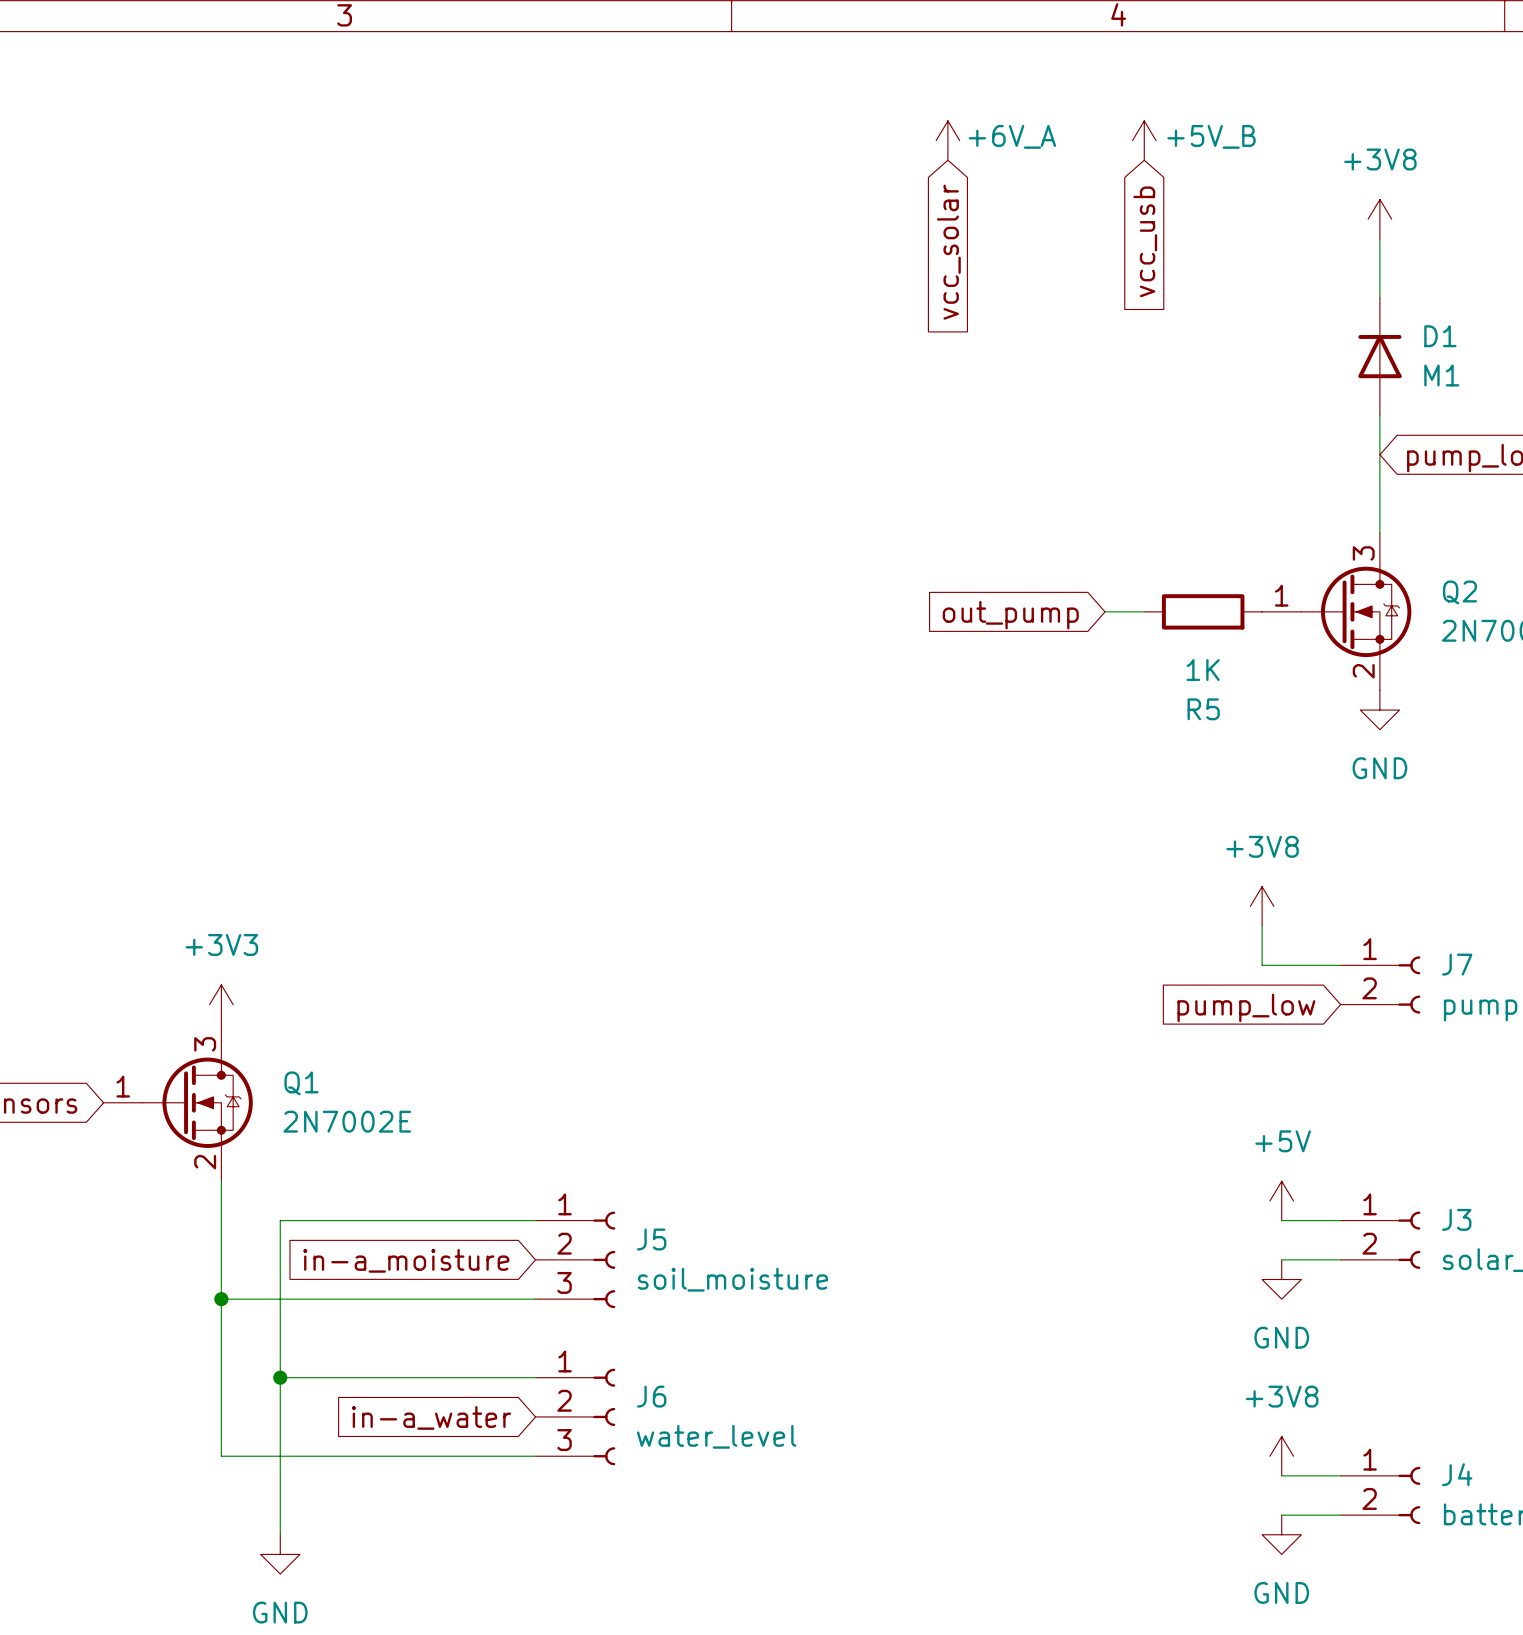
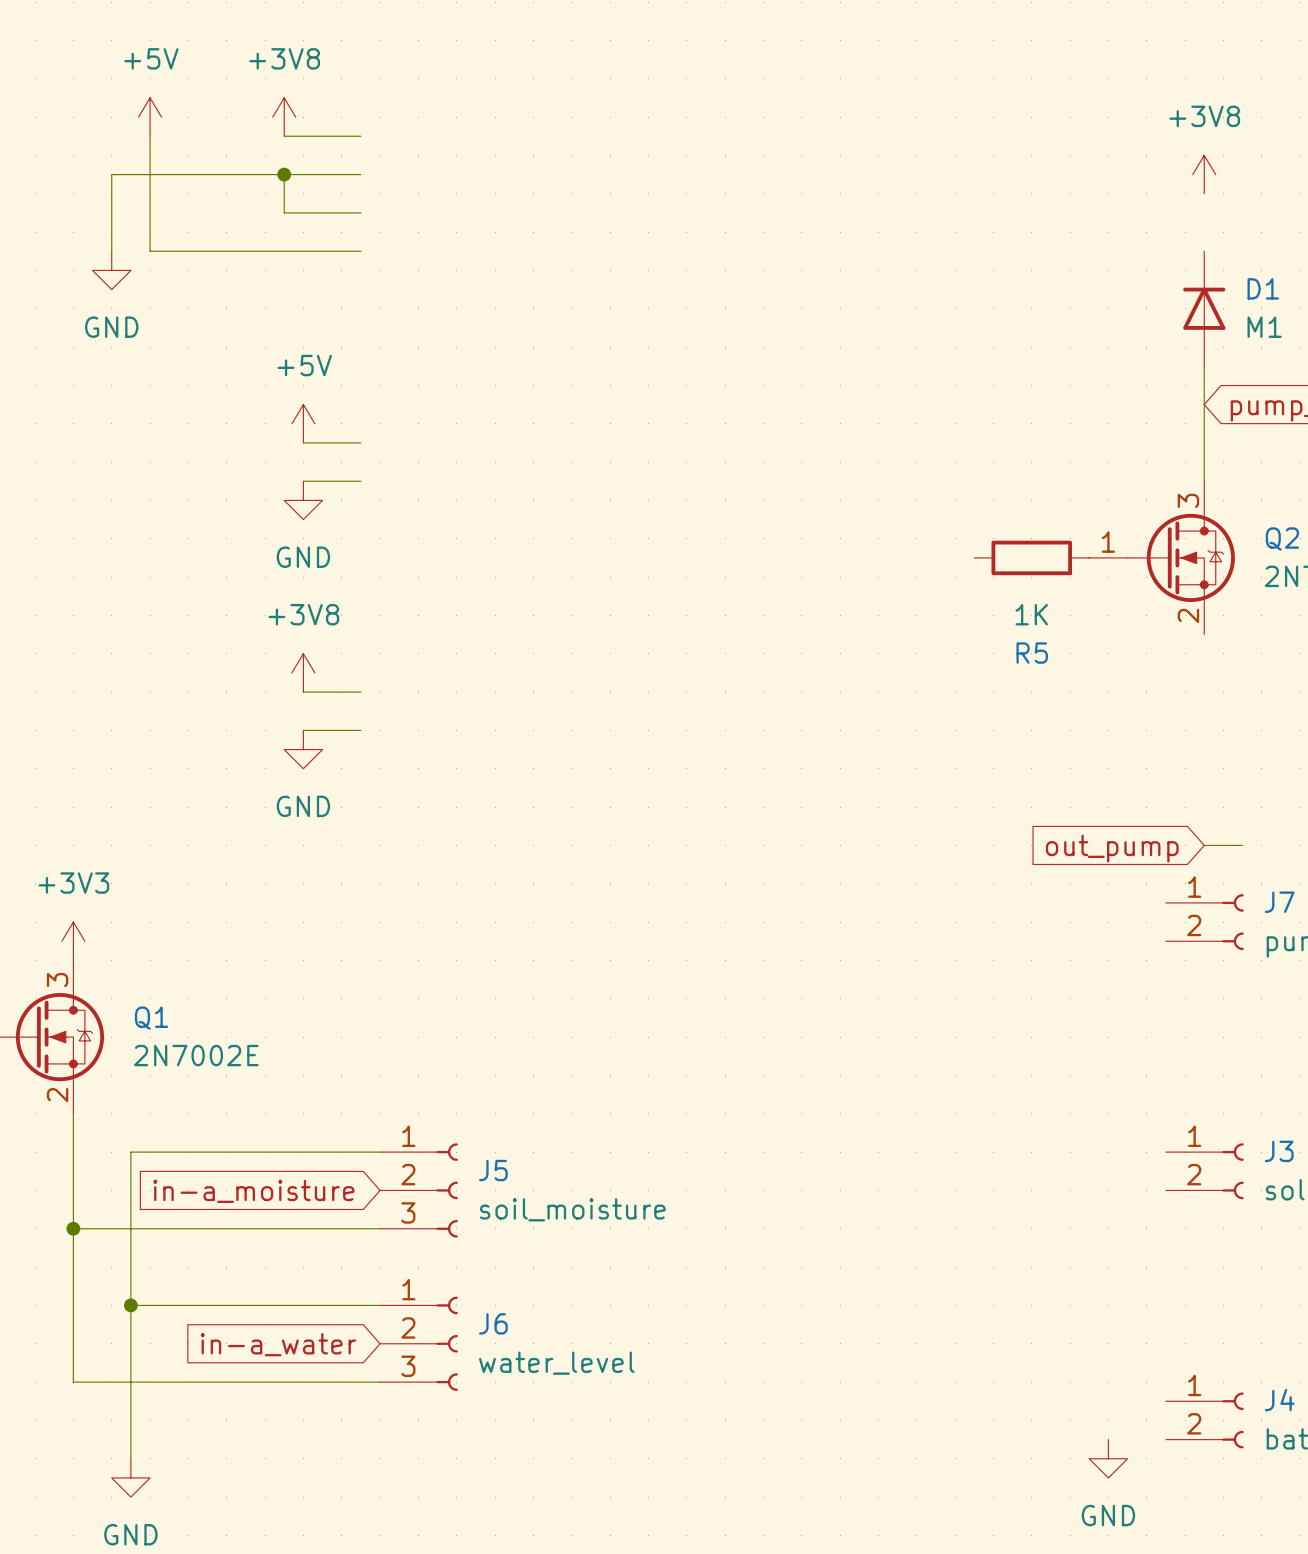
power symbol: +6V_A (947, 140) -> none
power symbol: +5V_B (1144, 140) -> none
power symbol: none -> +5V (150, 117)
power symbol: none -> +3V8 (284, 117)
wire: none -> (150, 136) (150, 251) (360, 251)
wire: none -> (284, 136) (360, 136)
wire: none -> (284, 174) (284, 212) (360, 212)
junction: none -> (284, 174)
wire: none -> (360, 174) (111, 174) (111, 251)
wire: (1379, 238) (1379, 297) -> none
global label: vcc_usb (1145, 241) -> none
global label: vcc_solar (948, 252) -> none
power symbol: none -> GND (111, 270)
power symbol: none -> +5V (303, 423)
wire: none -> (303, 442) (360, 442)
wire: none -> (303, 481) (360, 481)
power symbol: none -> GND (303, 500)
wire: (1105, 611) (1144, 611) -> none
global label: out_pump (1010, 615) -> none
power symbol: GND (1379, 710) -> none
power symbol: none -> +3V8 (303, 672)
wire: none -> (303, 692) (360, 692)
wire: none -> (303, 730) (360, 730)
power symbol: none -> GND (303, 749)
power symbol: +3V8 (1262, 906) -> none
wire: none -> (1204, 845) (1242, 845)
global label: none -> out_pump (1112, 848)
wire: (1262, 926) (1262, 965) (1340, 965) -> none
global label: pump_low (1246, 1007) -> none
power symbol: +5V (1281, 1200) -> none
wire: (1281, 1220) (1340, 1220) -> none
wire: (1281, 1259) (1340, 1259) -> none
power symbol: GND (1281, 1279) -> none
power symbol: +3V8 (1281, 1456) -> none
wire: (1281, 1475) (1340, 1475) -> none
wire: (1281, 1515) (1340, 1515) -> none

